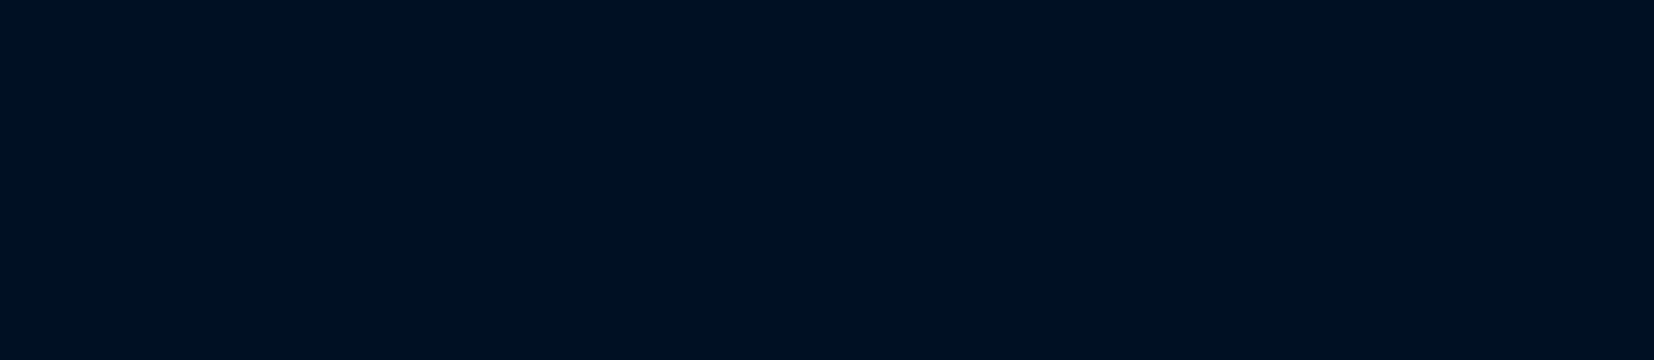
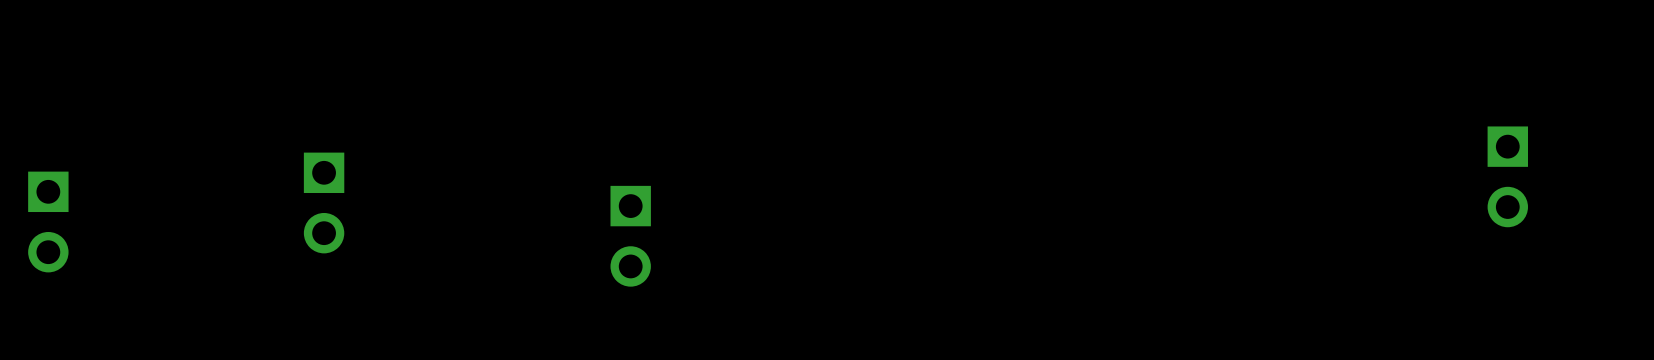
part: none -> (1507, 176)
part: none -> (324, 202)
part: none -> (48, 222)
part: none -> (630, 236)

